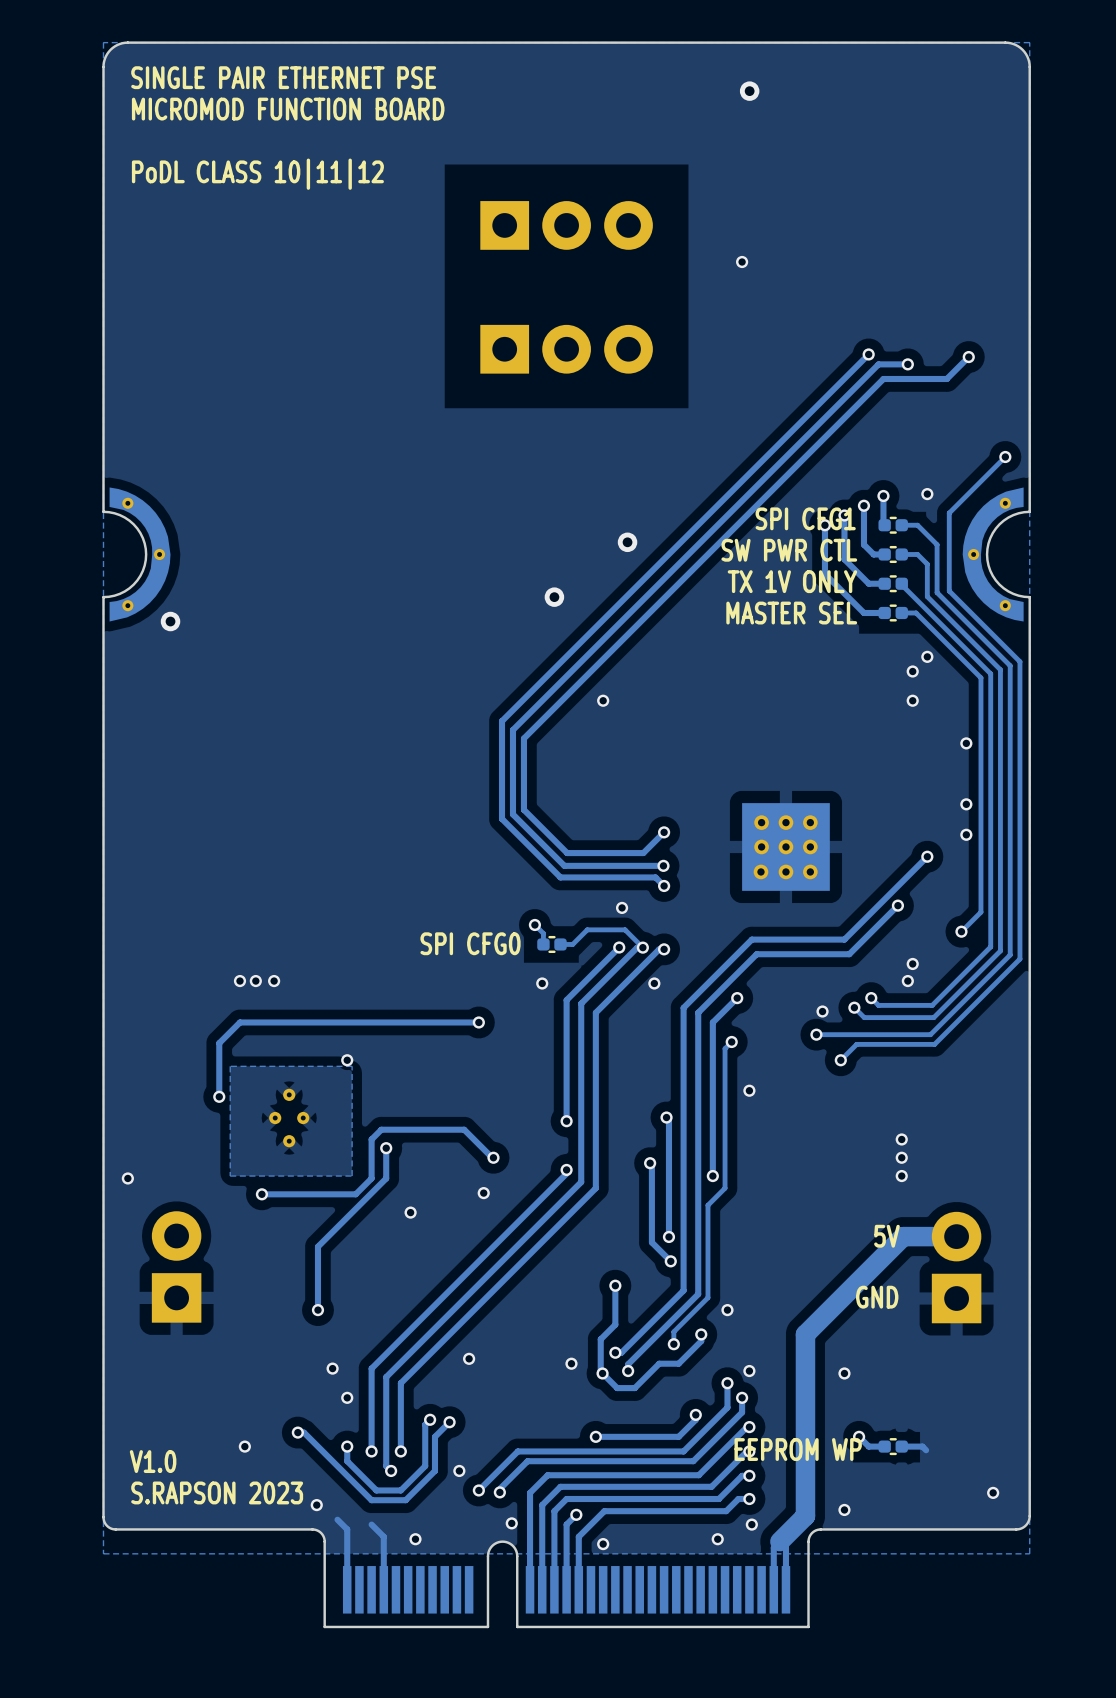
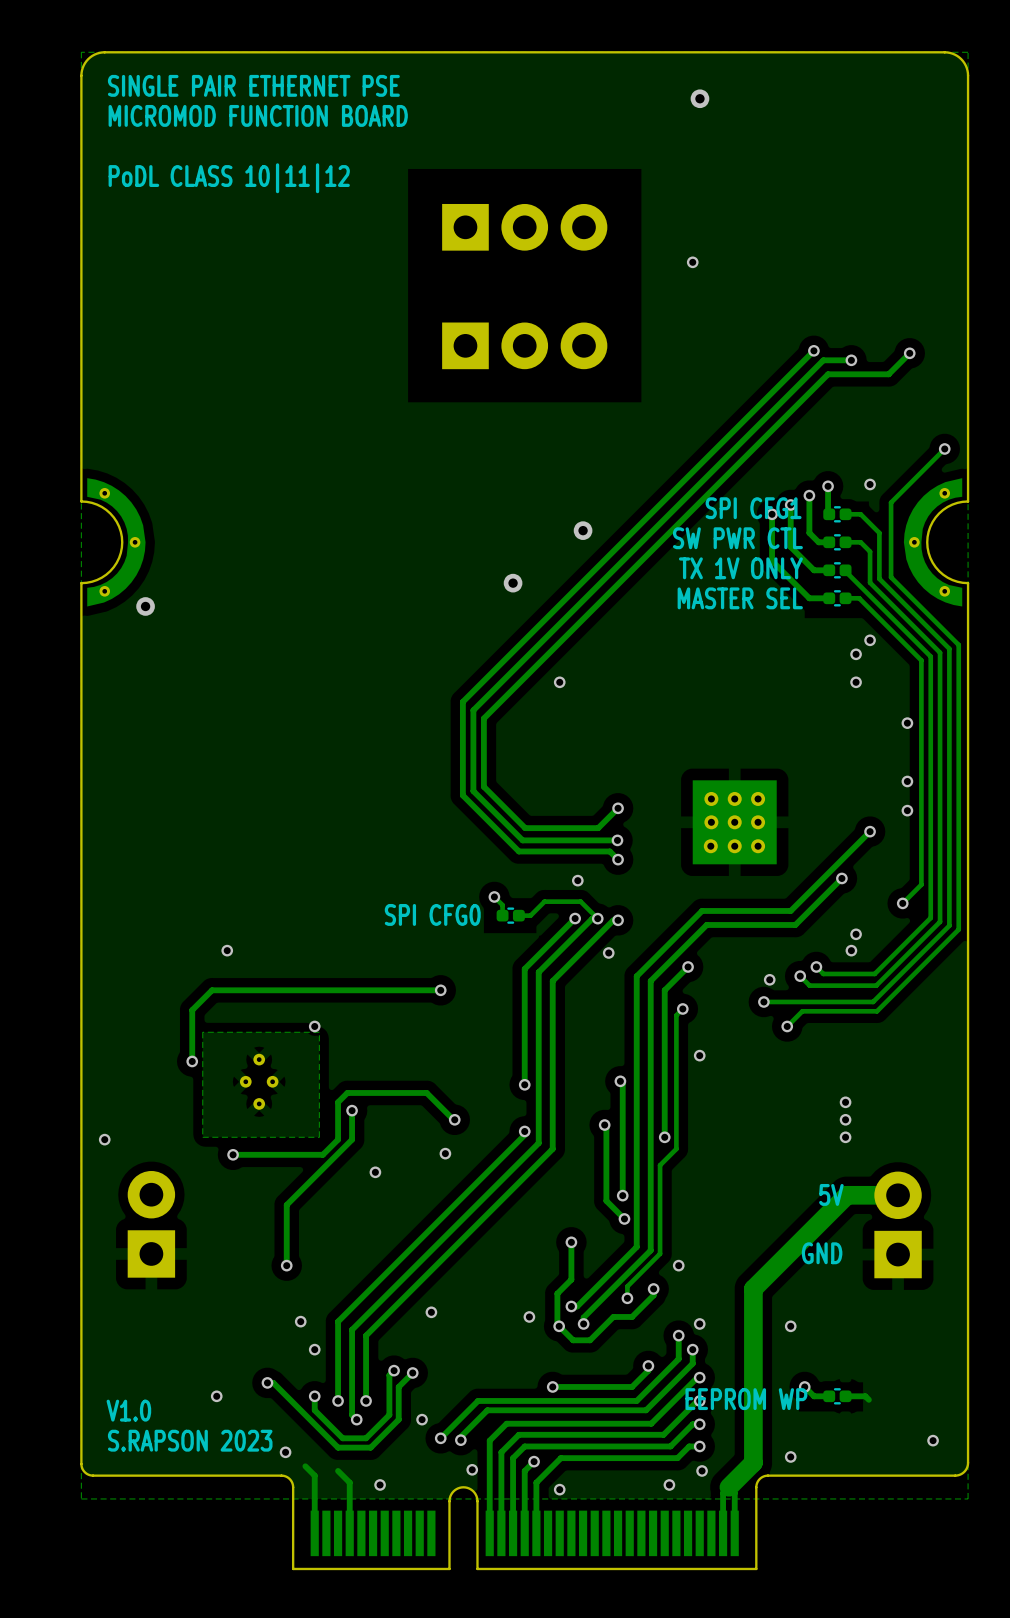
via: (239, 981) -> none
via: (274, 981) -> none
via: (542, 983) -> none

